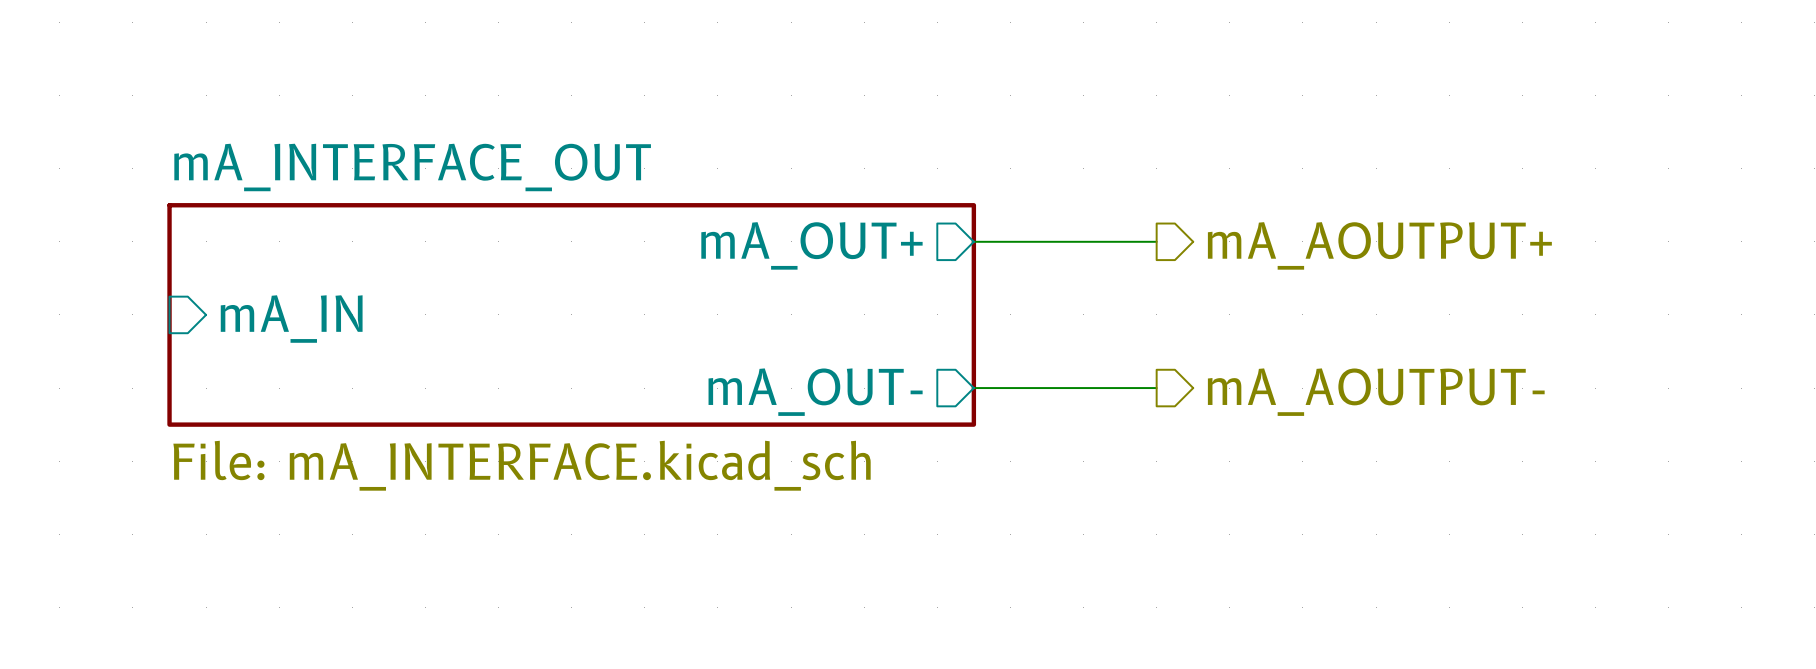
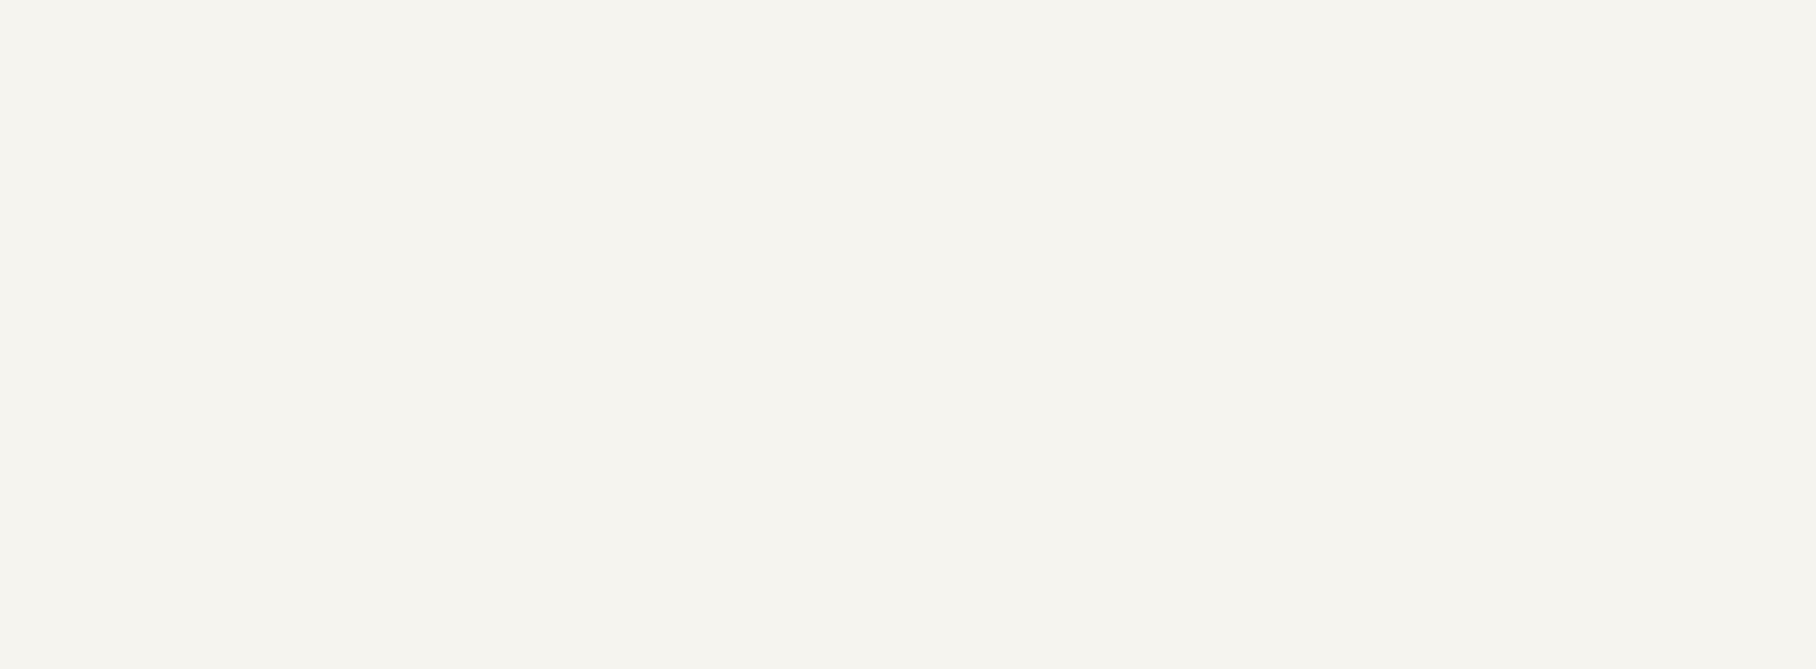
wire: (973, 241) (1156, 241) -> none
sheet pin: mA_OUT+ (811, 245) -> none
hierarchical label: mA_AOUTPUT+ (1379, 245) -> none
sheet mA_INTERFACE_OUT: File: mA_INTERFACE.kicad_sch (571, 314) -> none
sheet pin: mA_IN (291, 319) -> none
wire: (973, 388) (1156, 388) -> none
sheet pin: mA_OUT- (815, 392) -> none
hierarchical label: mA_AOUTPUT- (1376, 392) -> none

